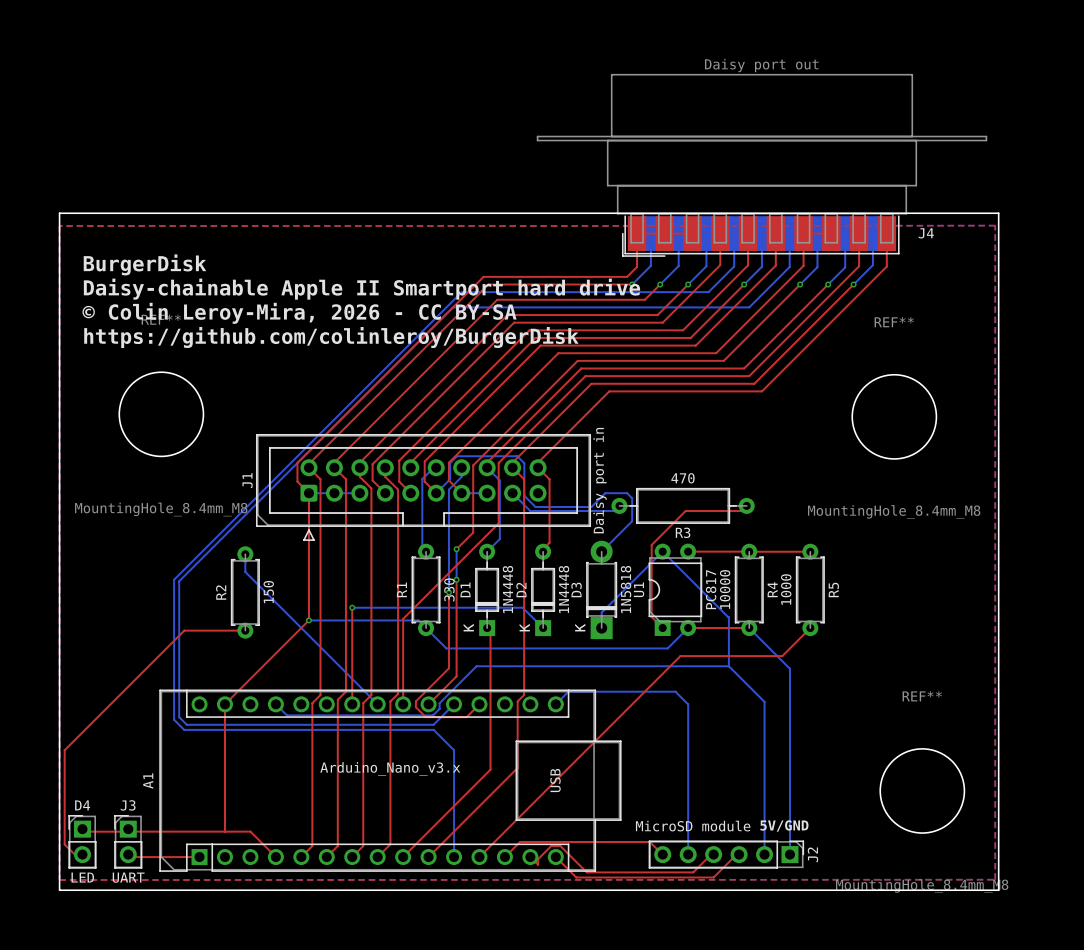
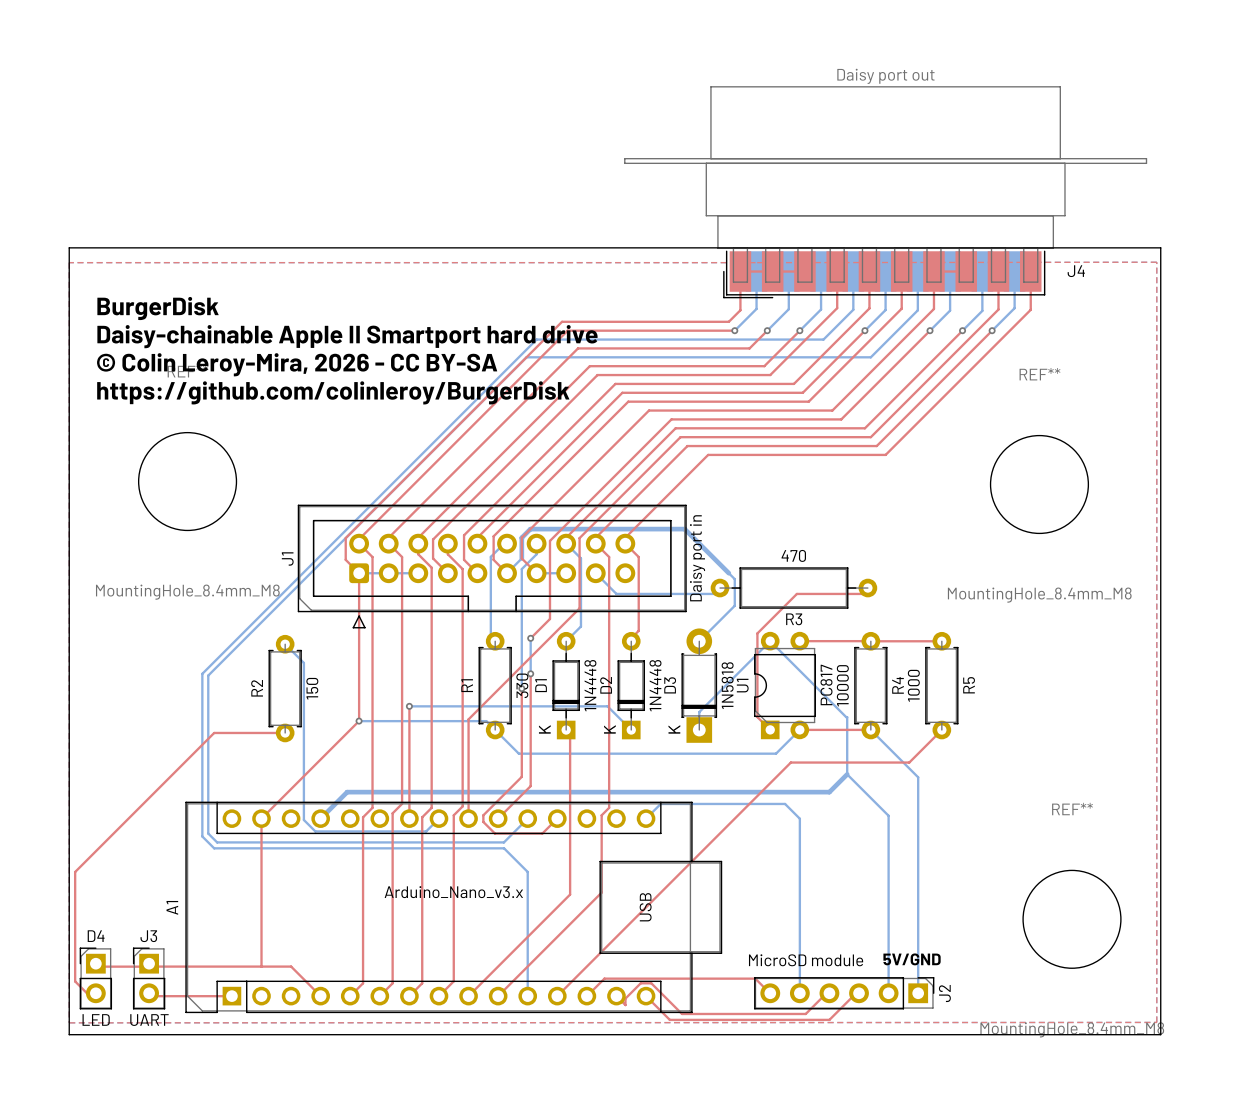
bottom track: (448, 480) (450, 462) (456, 456) (517, 456) (524, 463) (524, 495) (535, 507) (591, 507) (605, 493) (627, 493) -> (521, 558) (521, 537) (530, 529) (684, 529) (728, 573)
bottom track: (245, 554) (245, 571) (377, 704) -> (285, 644) (303, 662) (303, 819) (315, 831) (333, 831)
bottom track: (728, 666) (476, 666) (439, 703) (439, 708) (433, 715) (366, 715) -> (847, 774) (829, 792) (347, 792) (320, 818)
bottom track: (275, 704) (286, 715) -> none
bottom track: none -> (438, 818) (426, 831)

